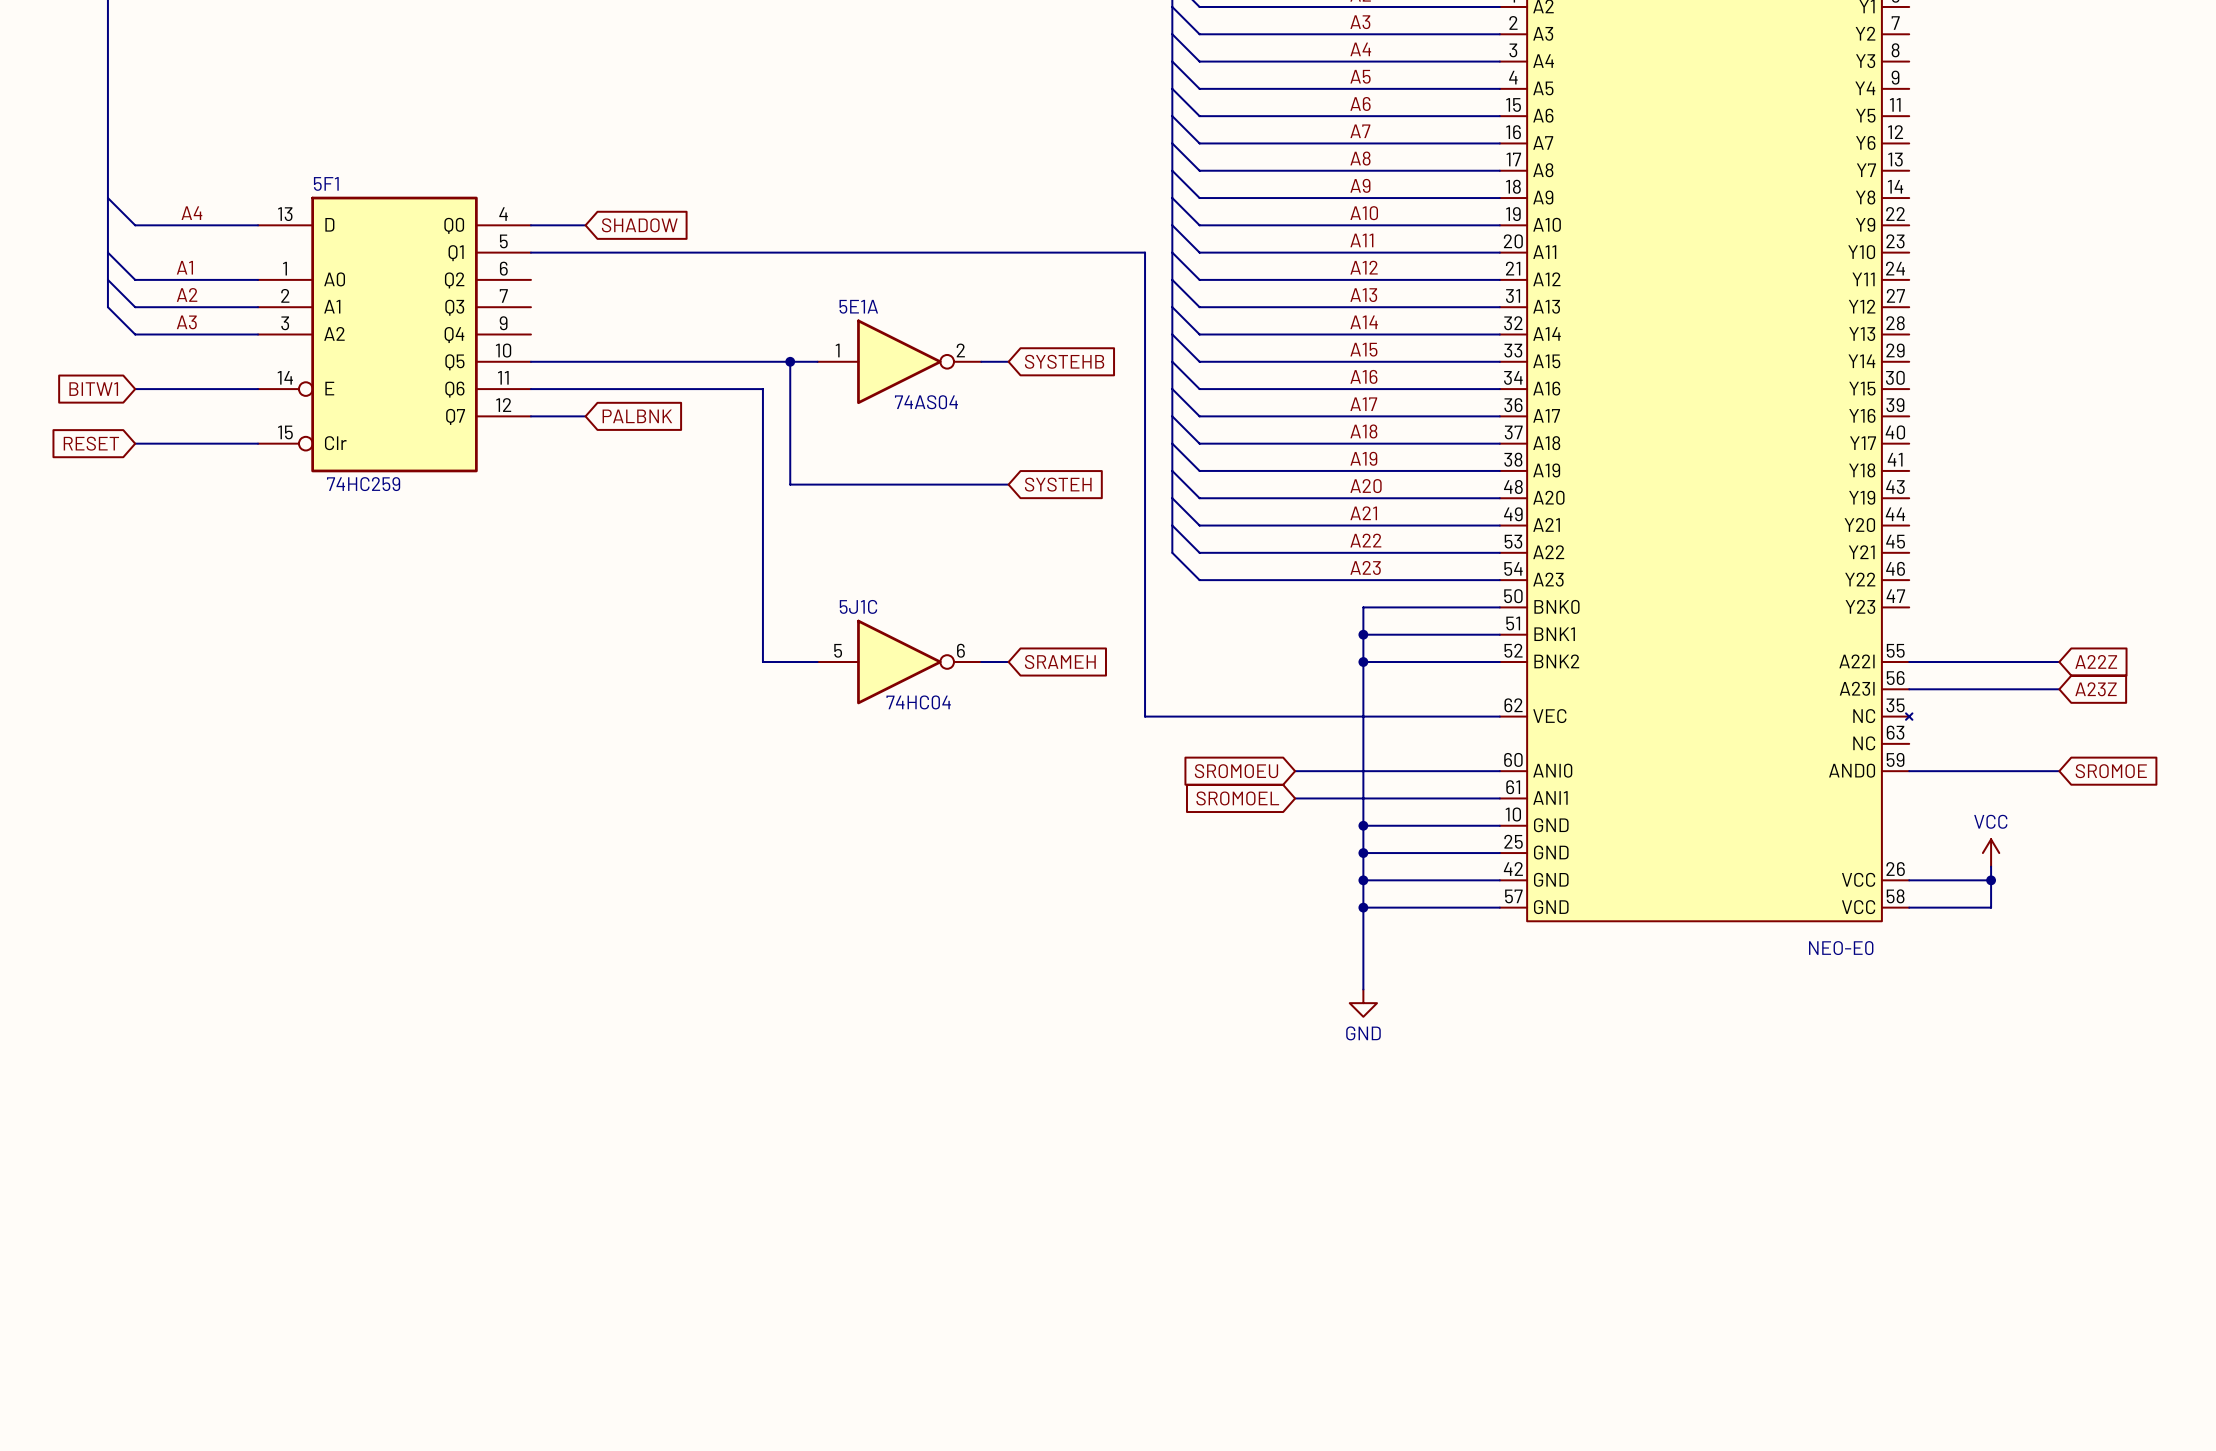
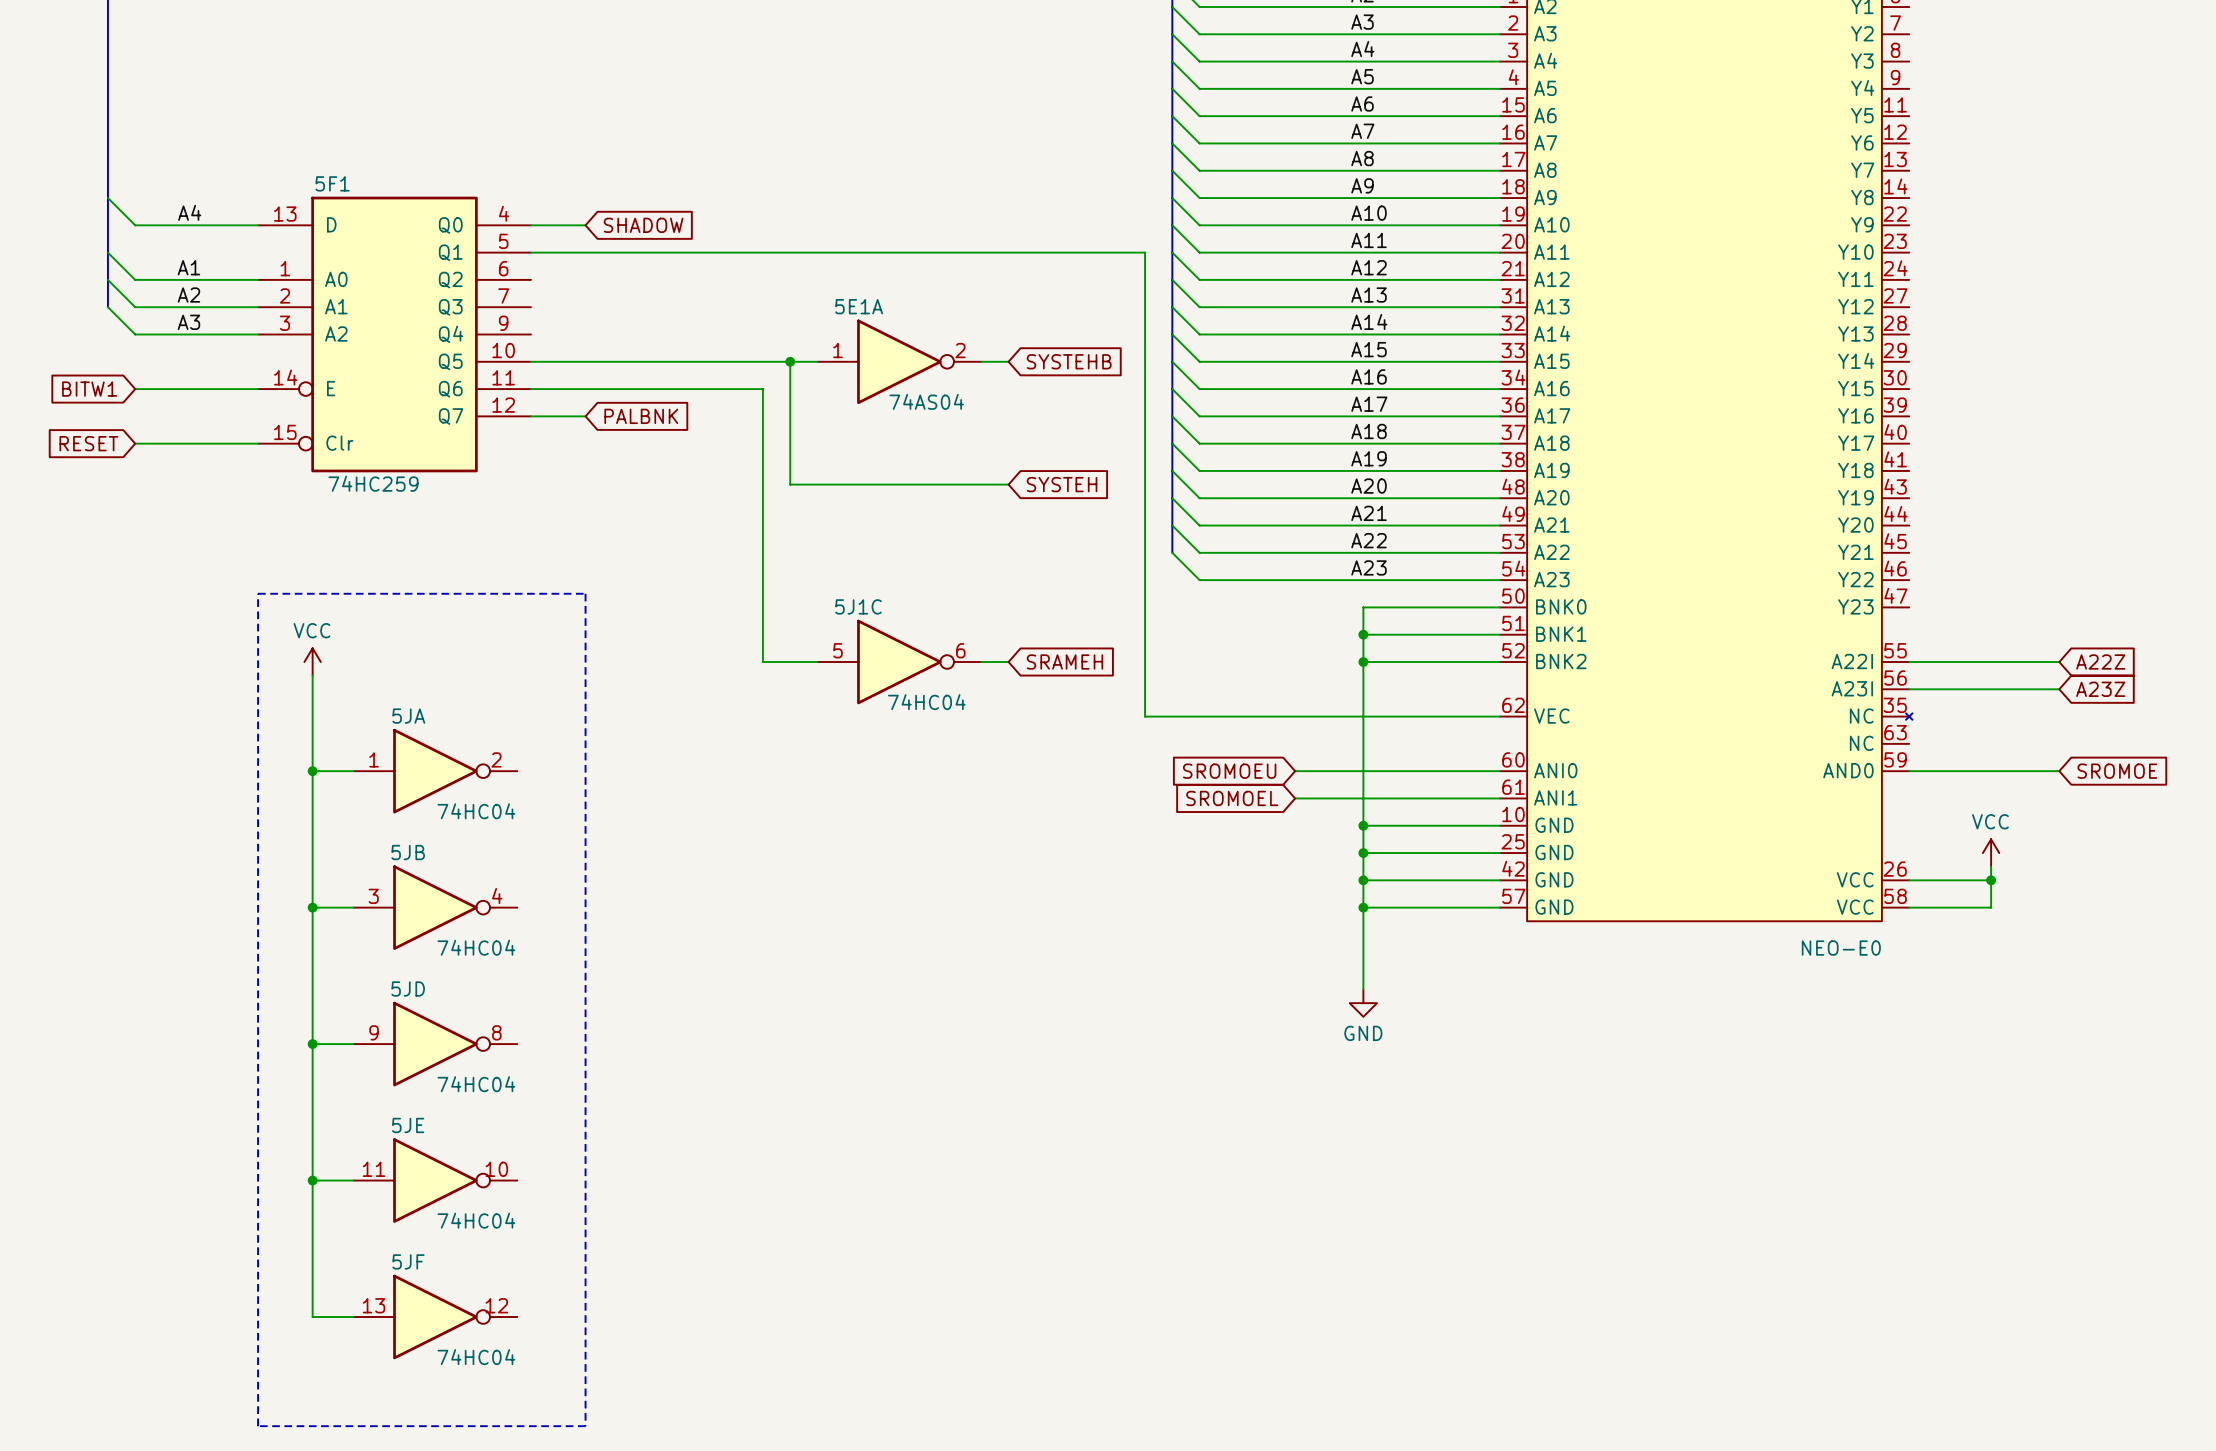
line: none -> (258, 593) (585, 593) (585, 1426) (258, 1426) (258, 593)
power symbol: none -> VCC (312, 662)
wire: none -> (312, 675) (312, 1317) (353, 1317)
wire: none -> (312, 771) (353, 771)
junction: none -> (312, 771)
5JA: none -> 74HC04 (435, 771)
wire: none -> (312, 907) (353, 907)
junction: none -> (312, 907)
5JB: none -> 74HC04 (435, 907)
wire: none -> (312, 1044) (353, 1044)
junction: none -> (312, 1044)
5JD: none -> 74HC04 (435, 1044)
wire: none -> (312, 1180) (353, 1180)
junction: none -> (312, 1180)
5JE: none -> 74HC04 (435, 1180)
5JF: none -> 74HC04 (435, 1317)

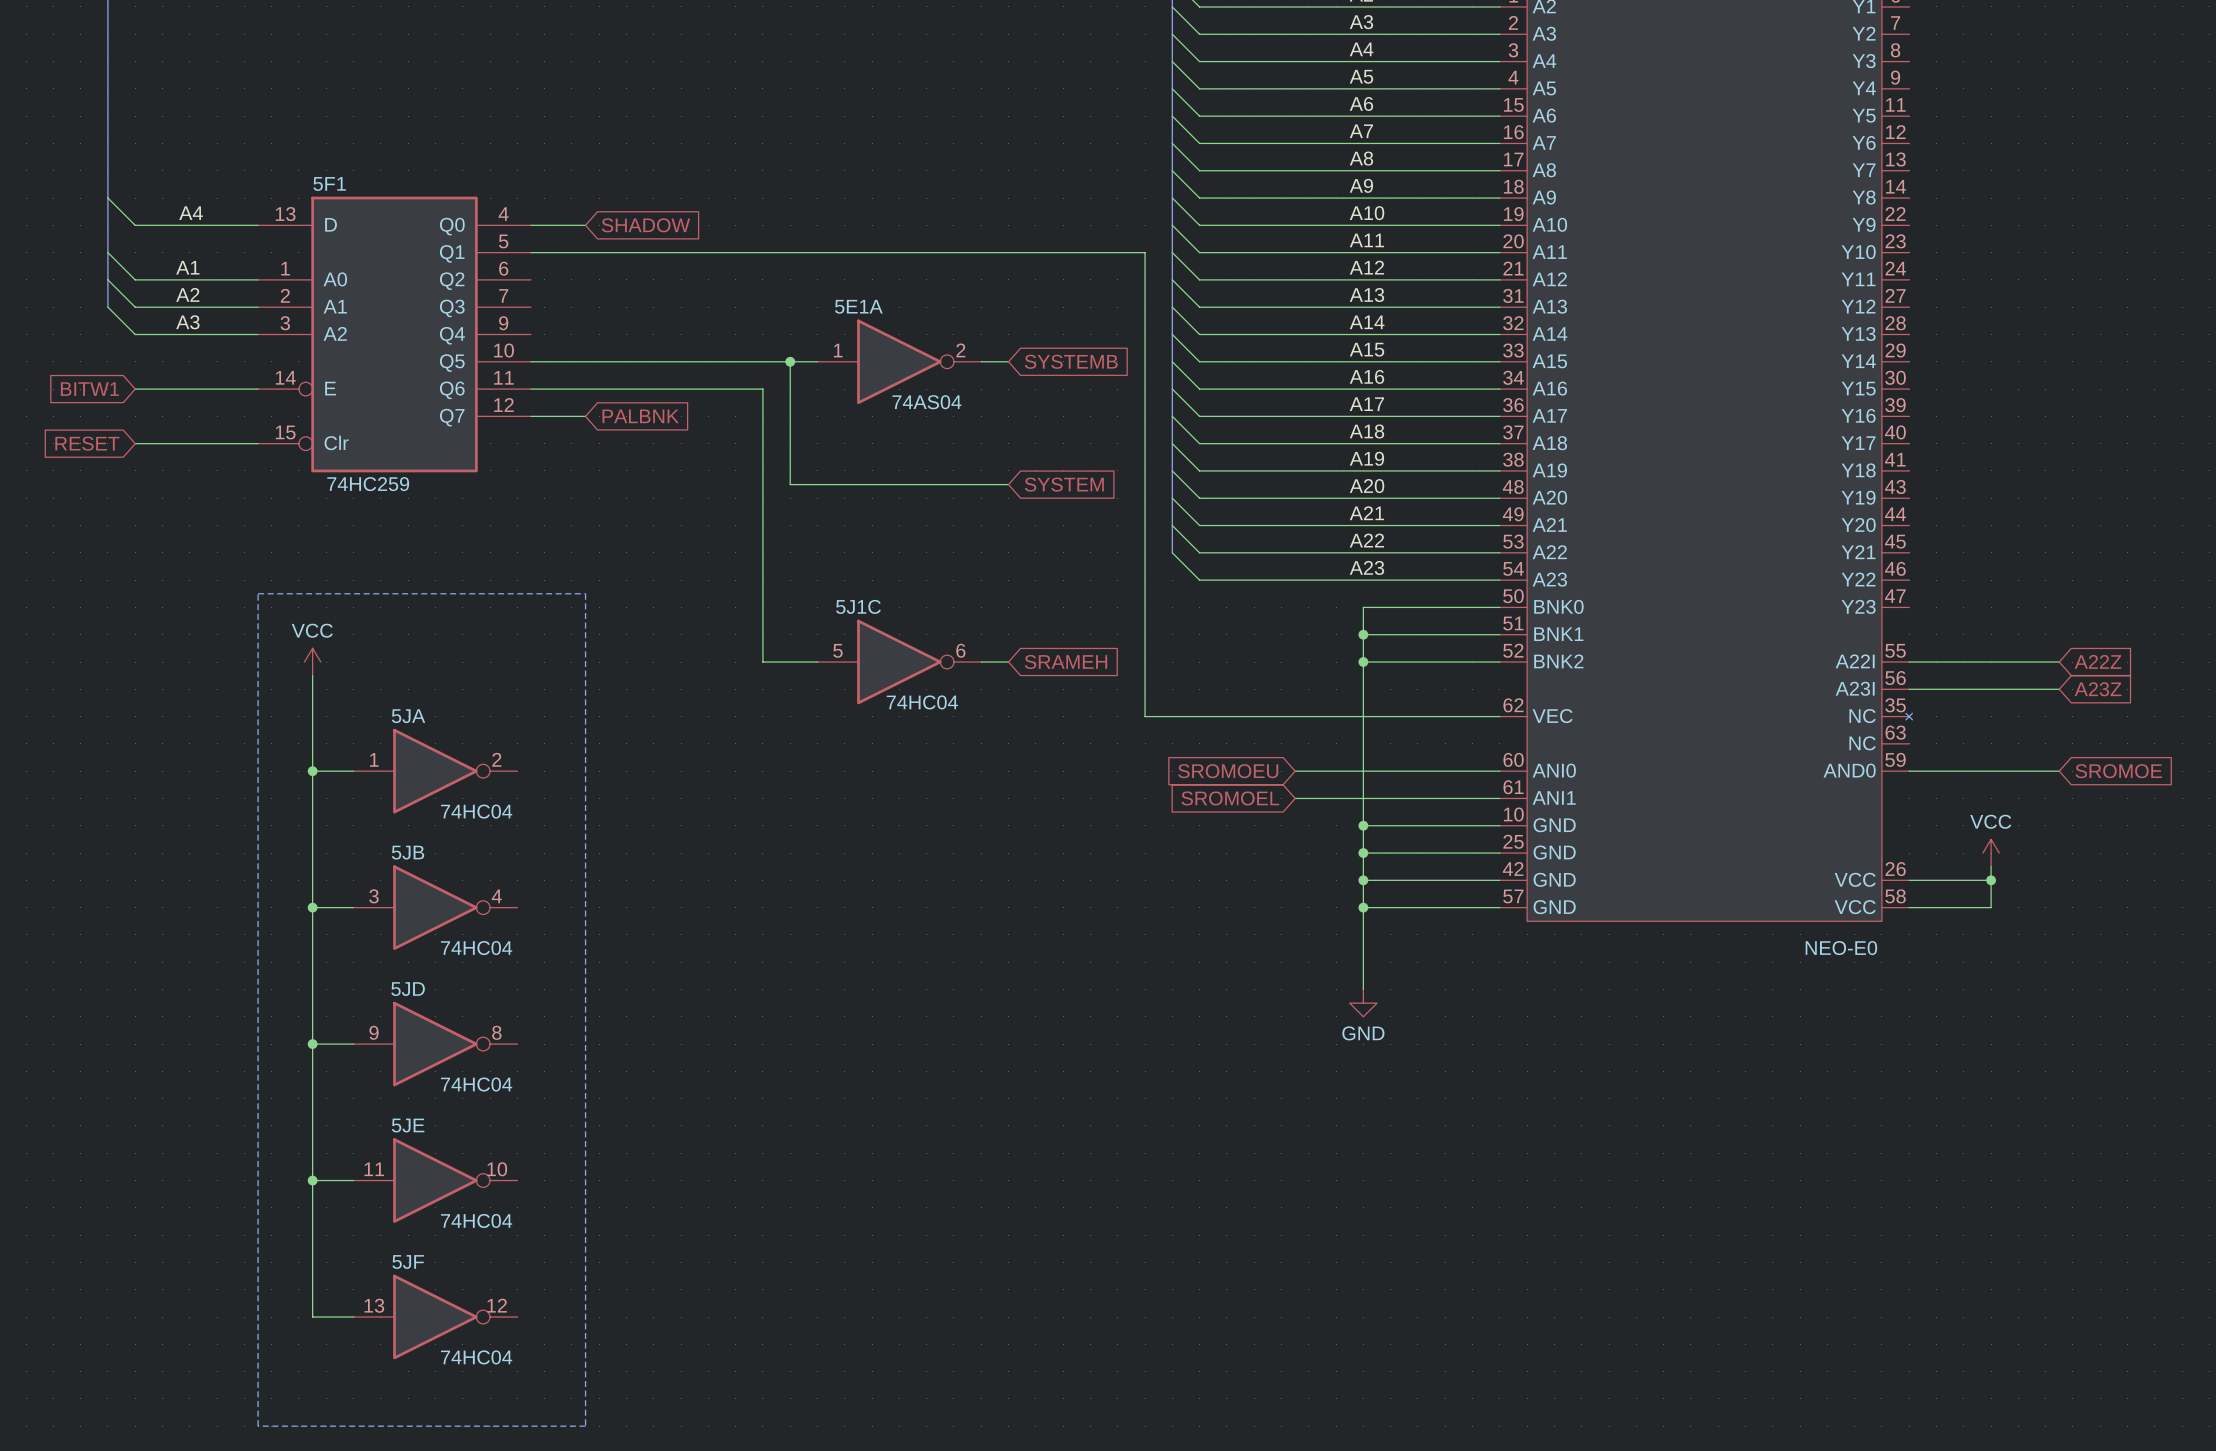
global label: SYSTEHB (1069, 361) -> SYSTEMB (1071, 361)
global label: SYSTEH (1062, 484) -> SYSTEM (1064, 484)

